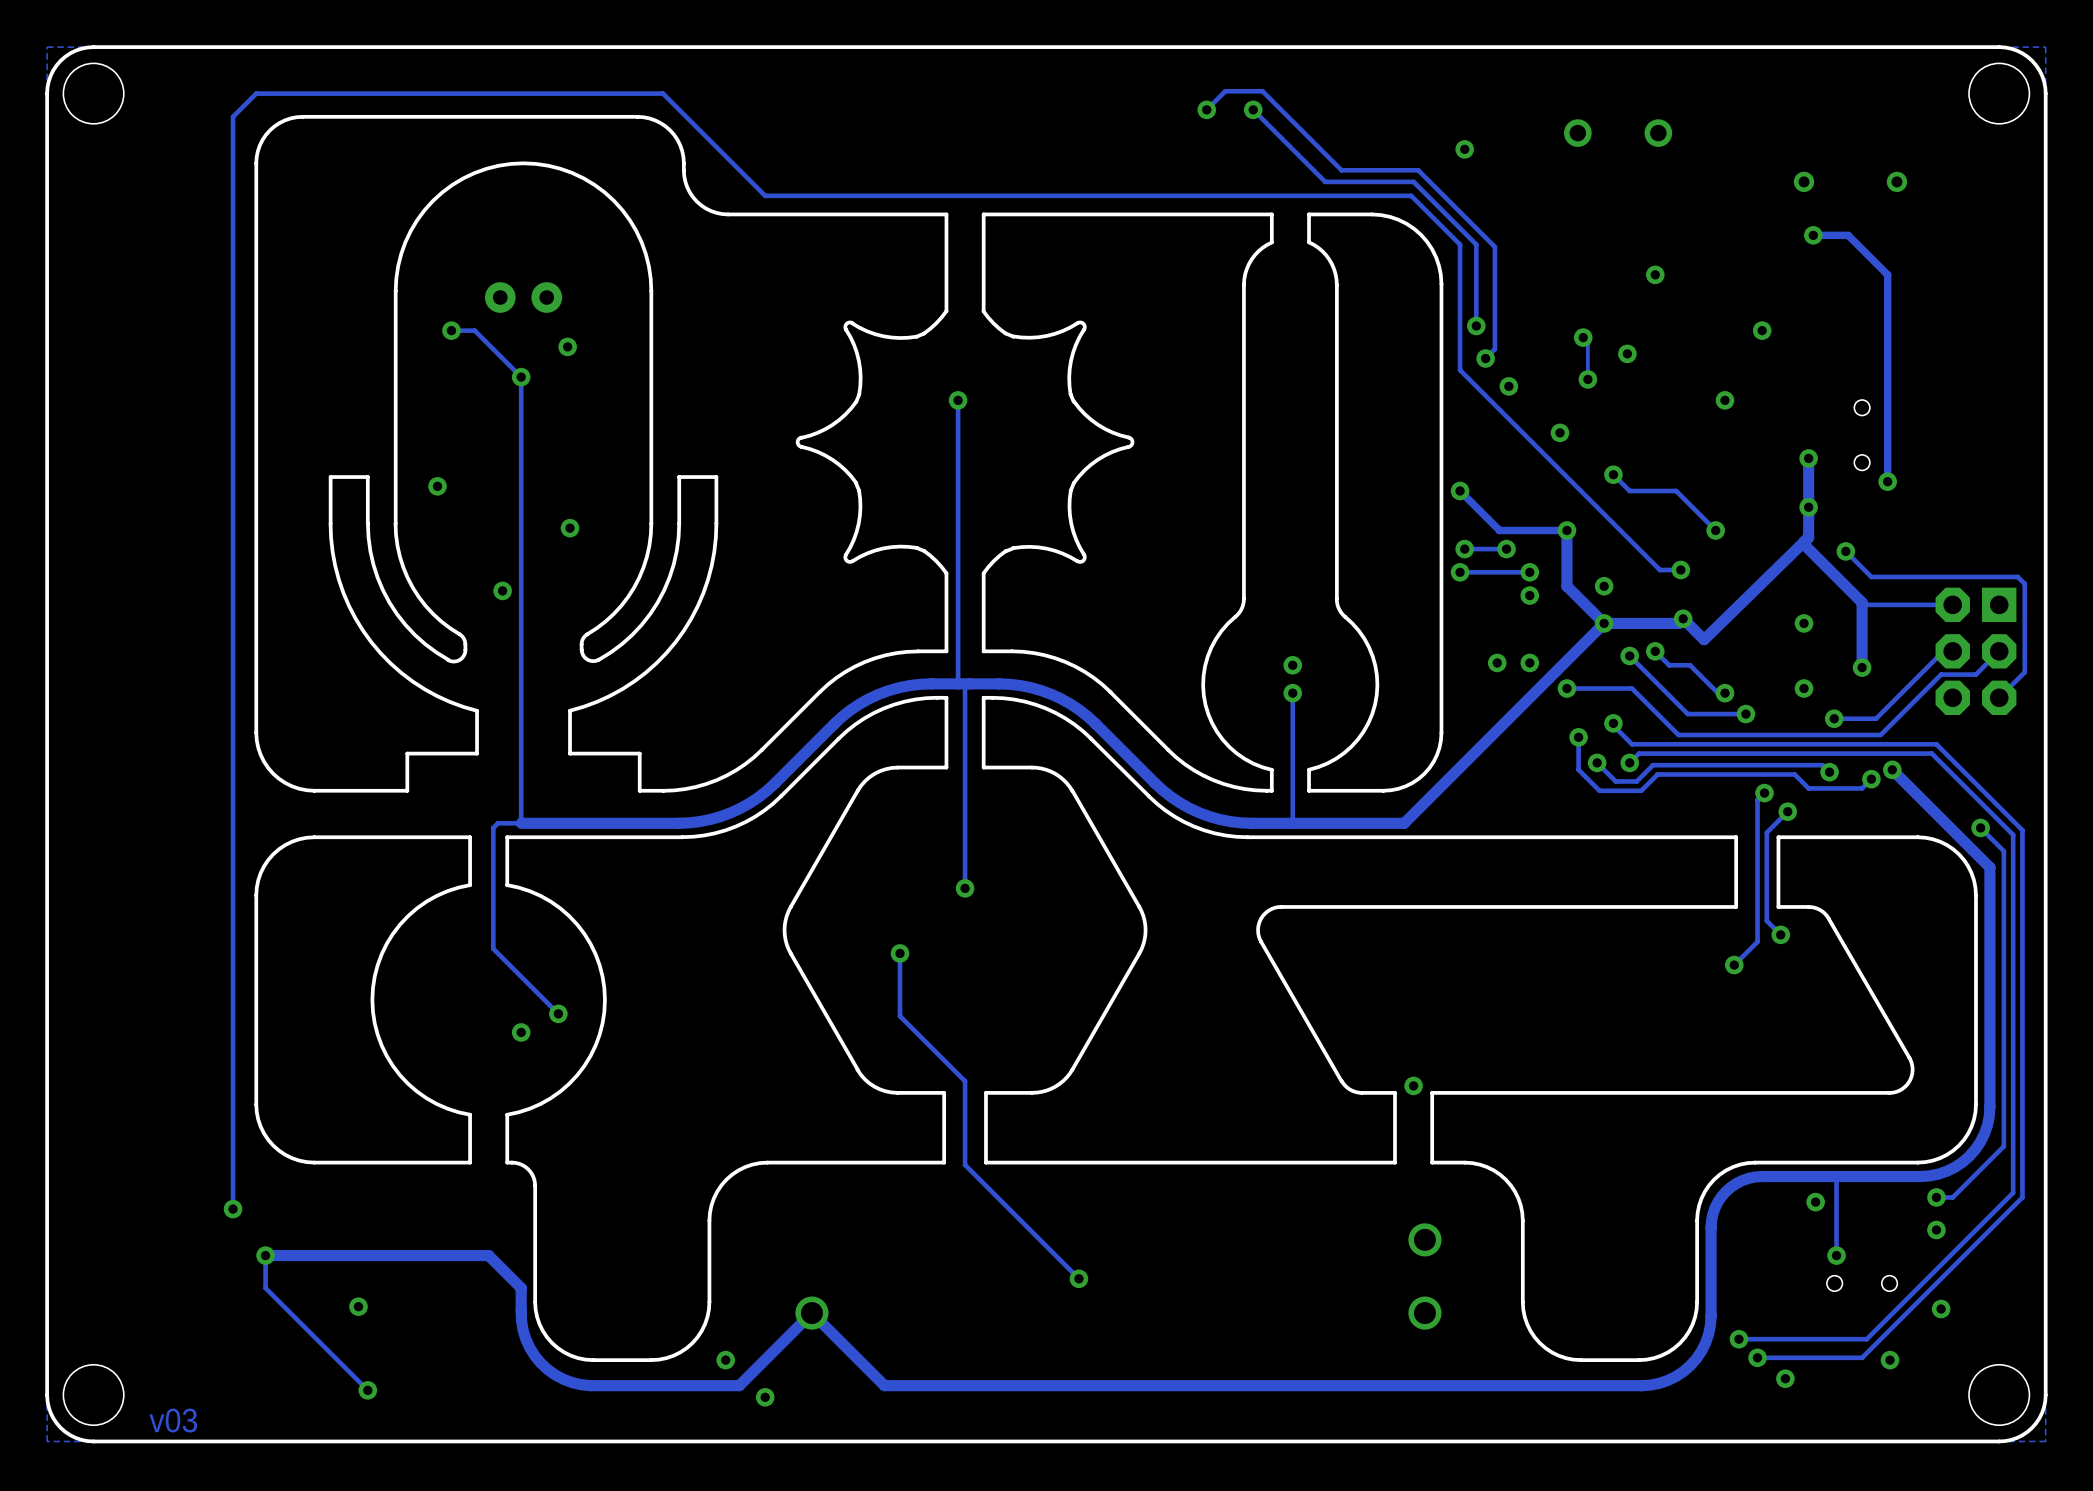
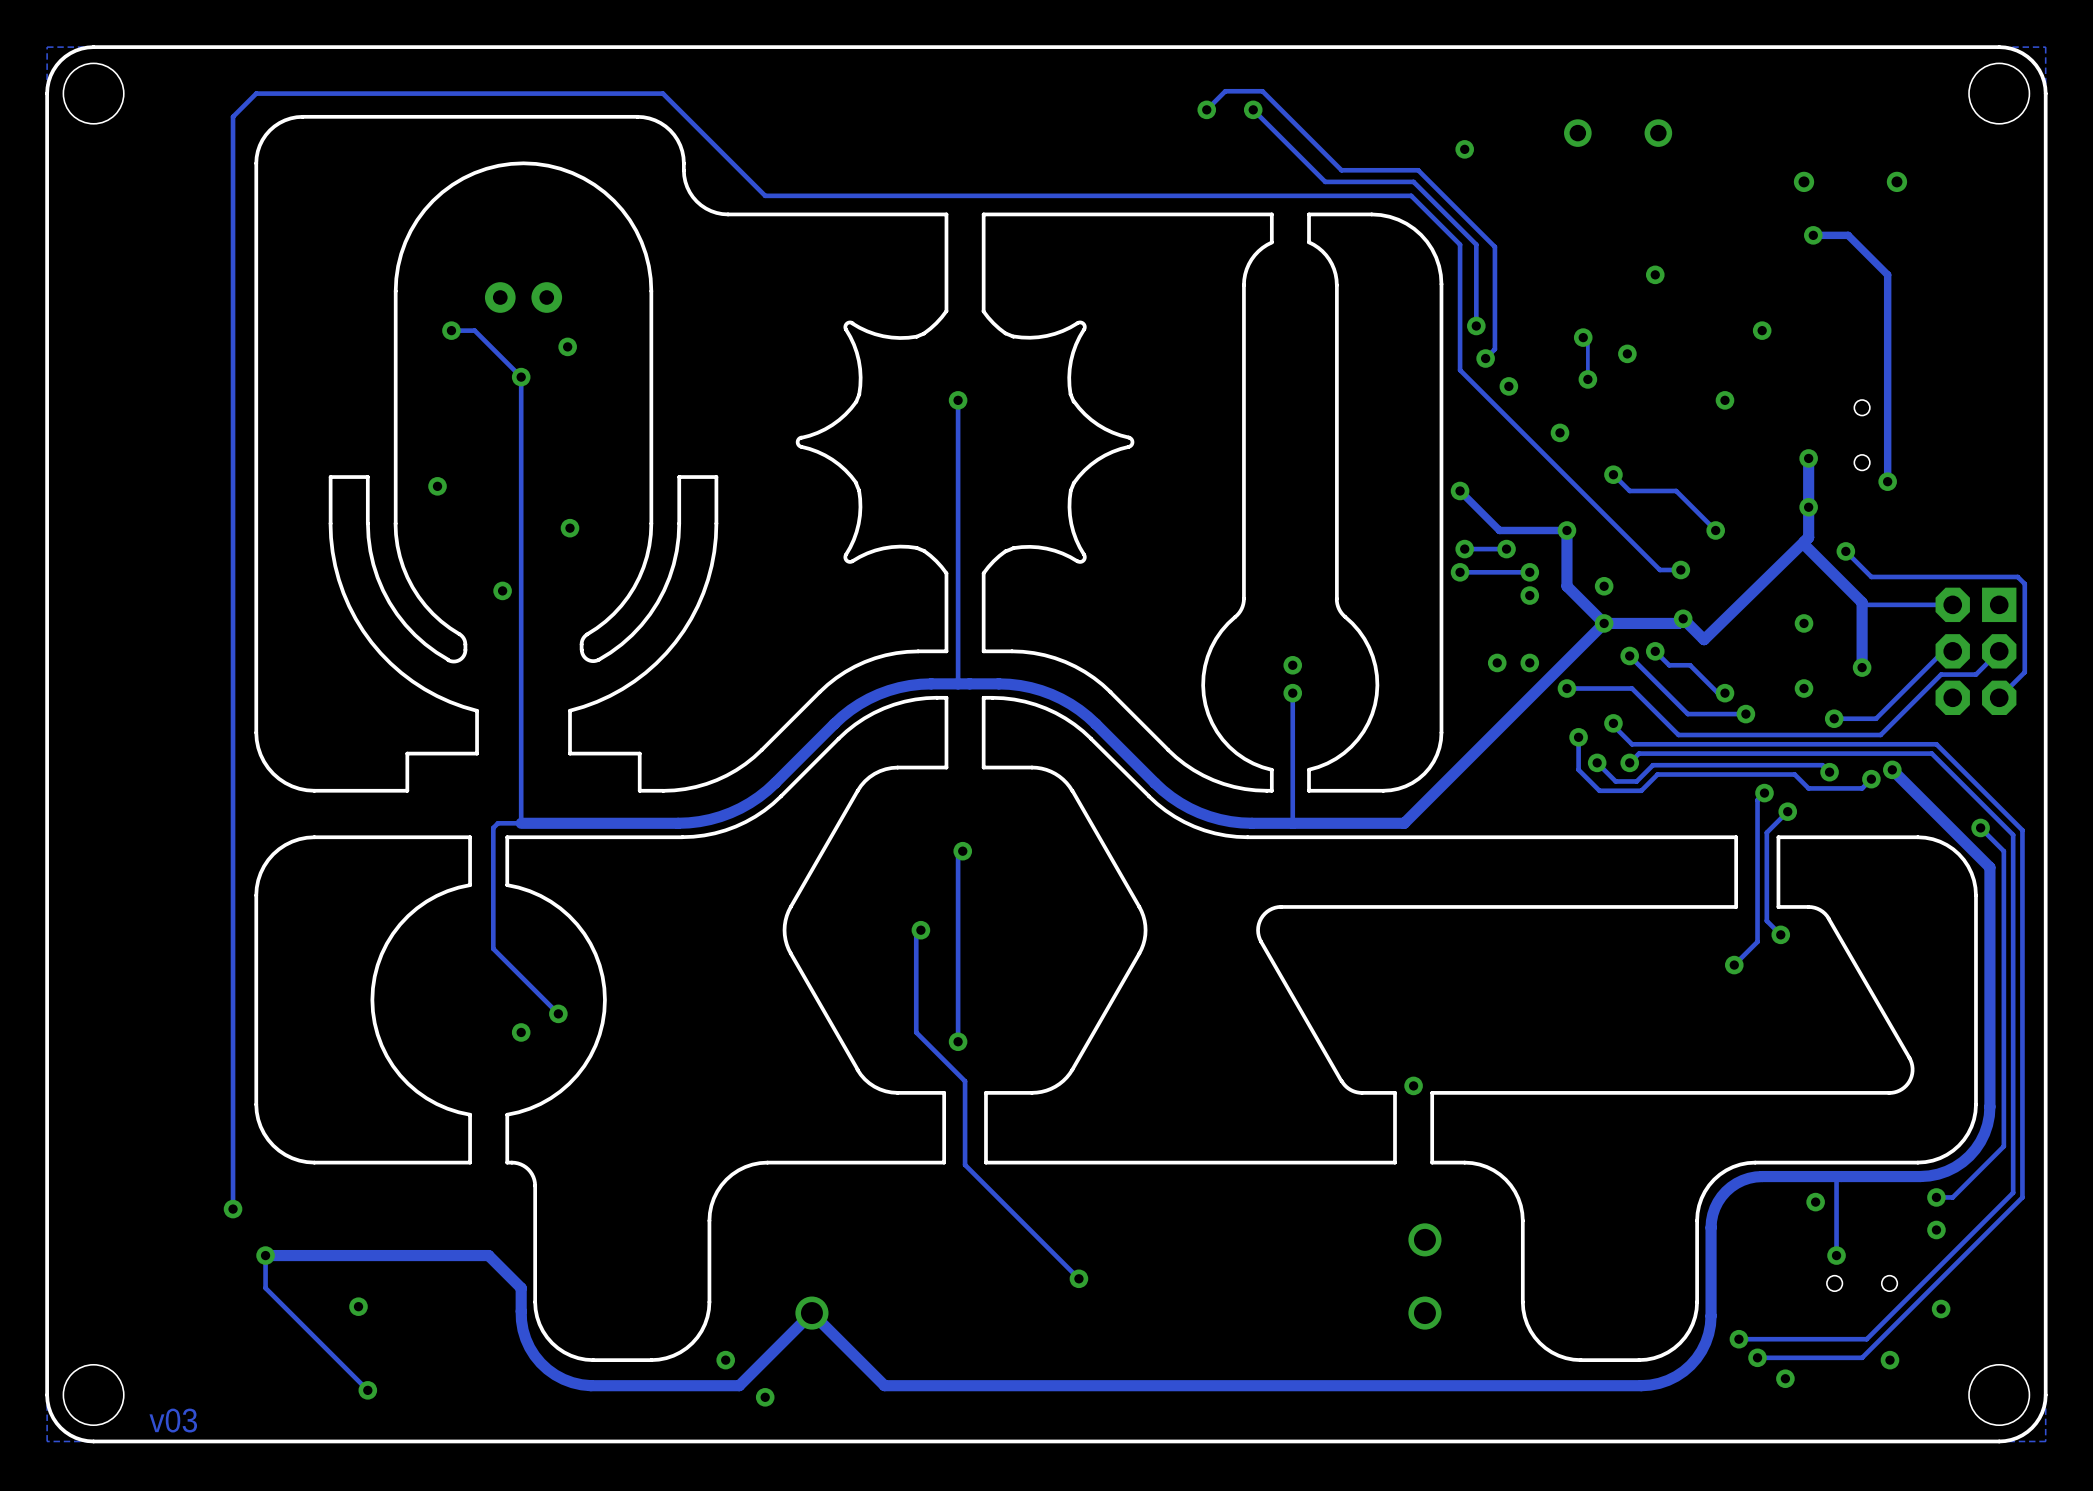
track: (965, 683) (965, 888) -> none
track: none -> (962, 851) (958, 855) (958, 1041)
via: none -> (962, 851)
via: (965, 888) -> none
via: none -> (920, 930)
track: (899, 953) (899, 1016) (916, 1032) -> (920, 930) (916, 925) (916, 1032)
via: (899, 953) -> none
via: none -> (958, 1041)

